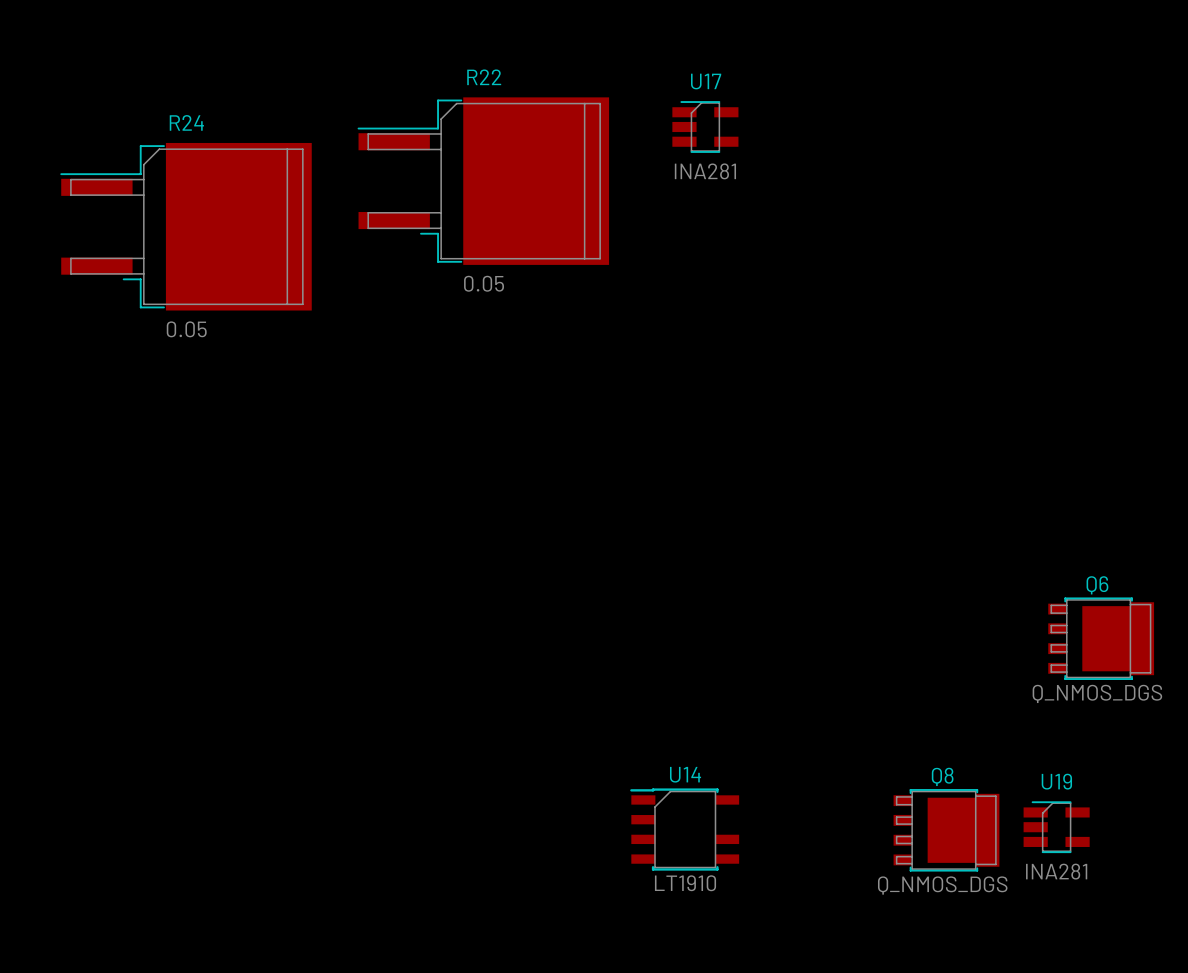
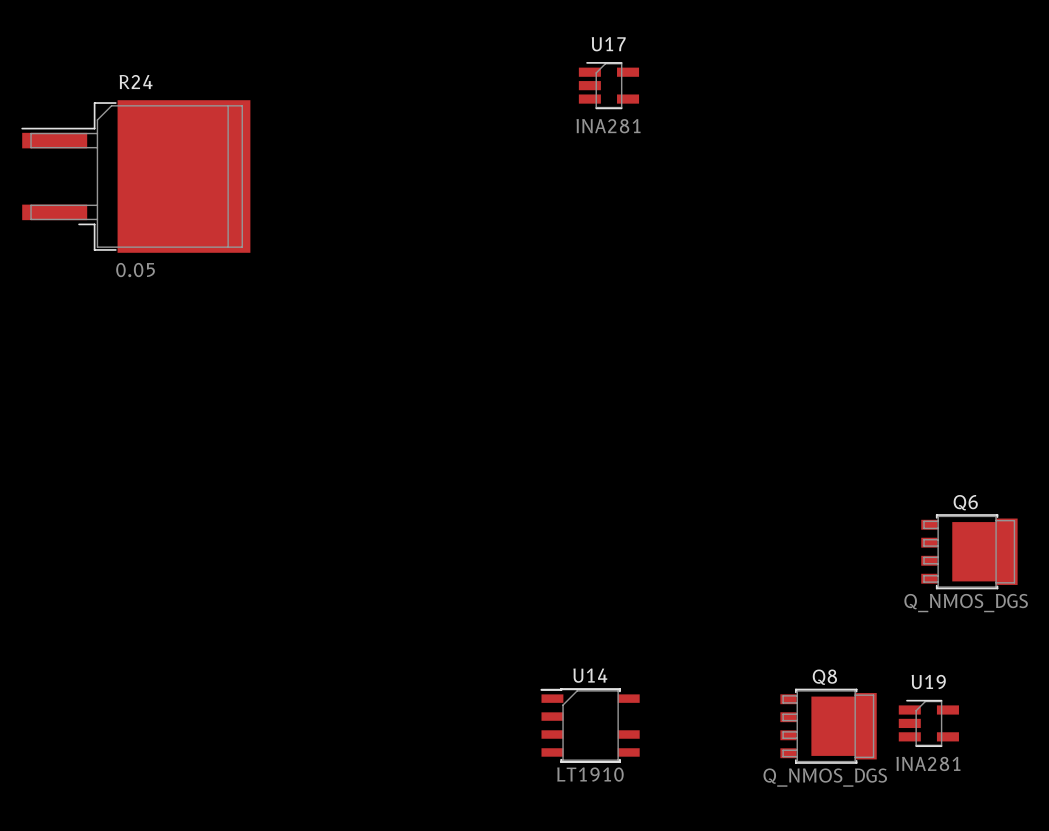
R22: 0.05 (483, 181) -> none

